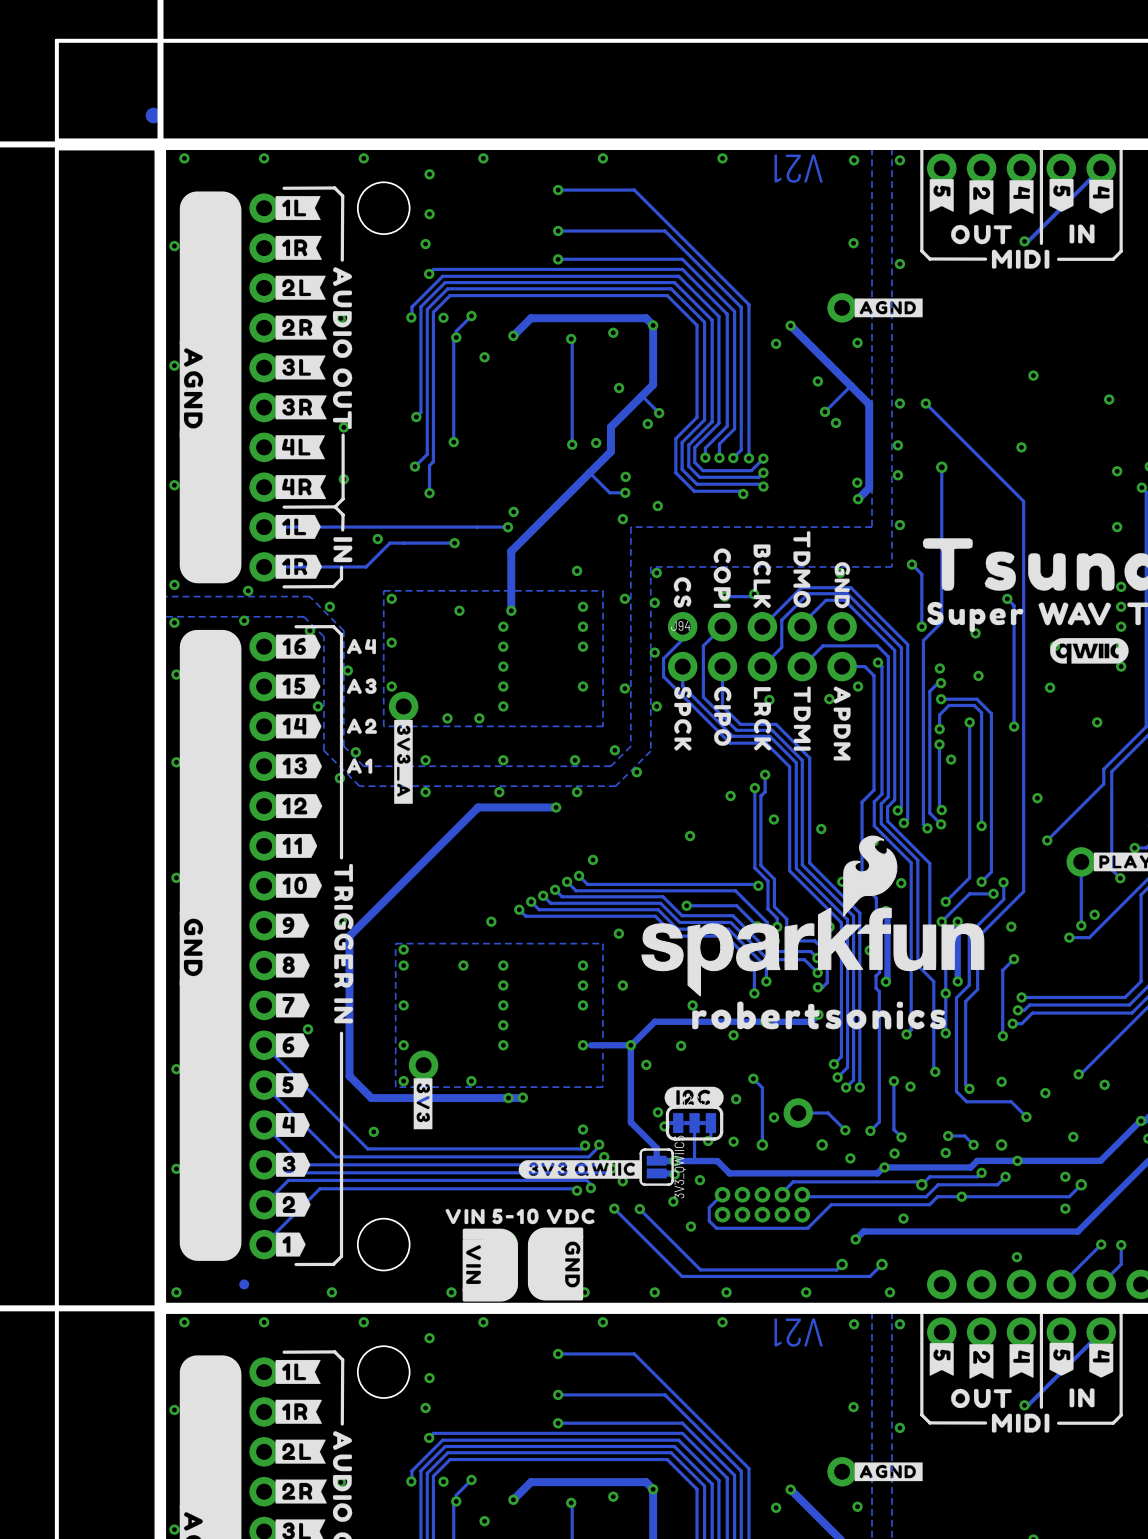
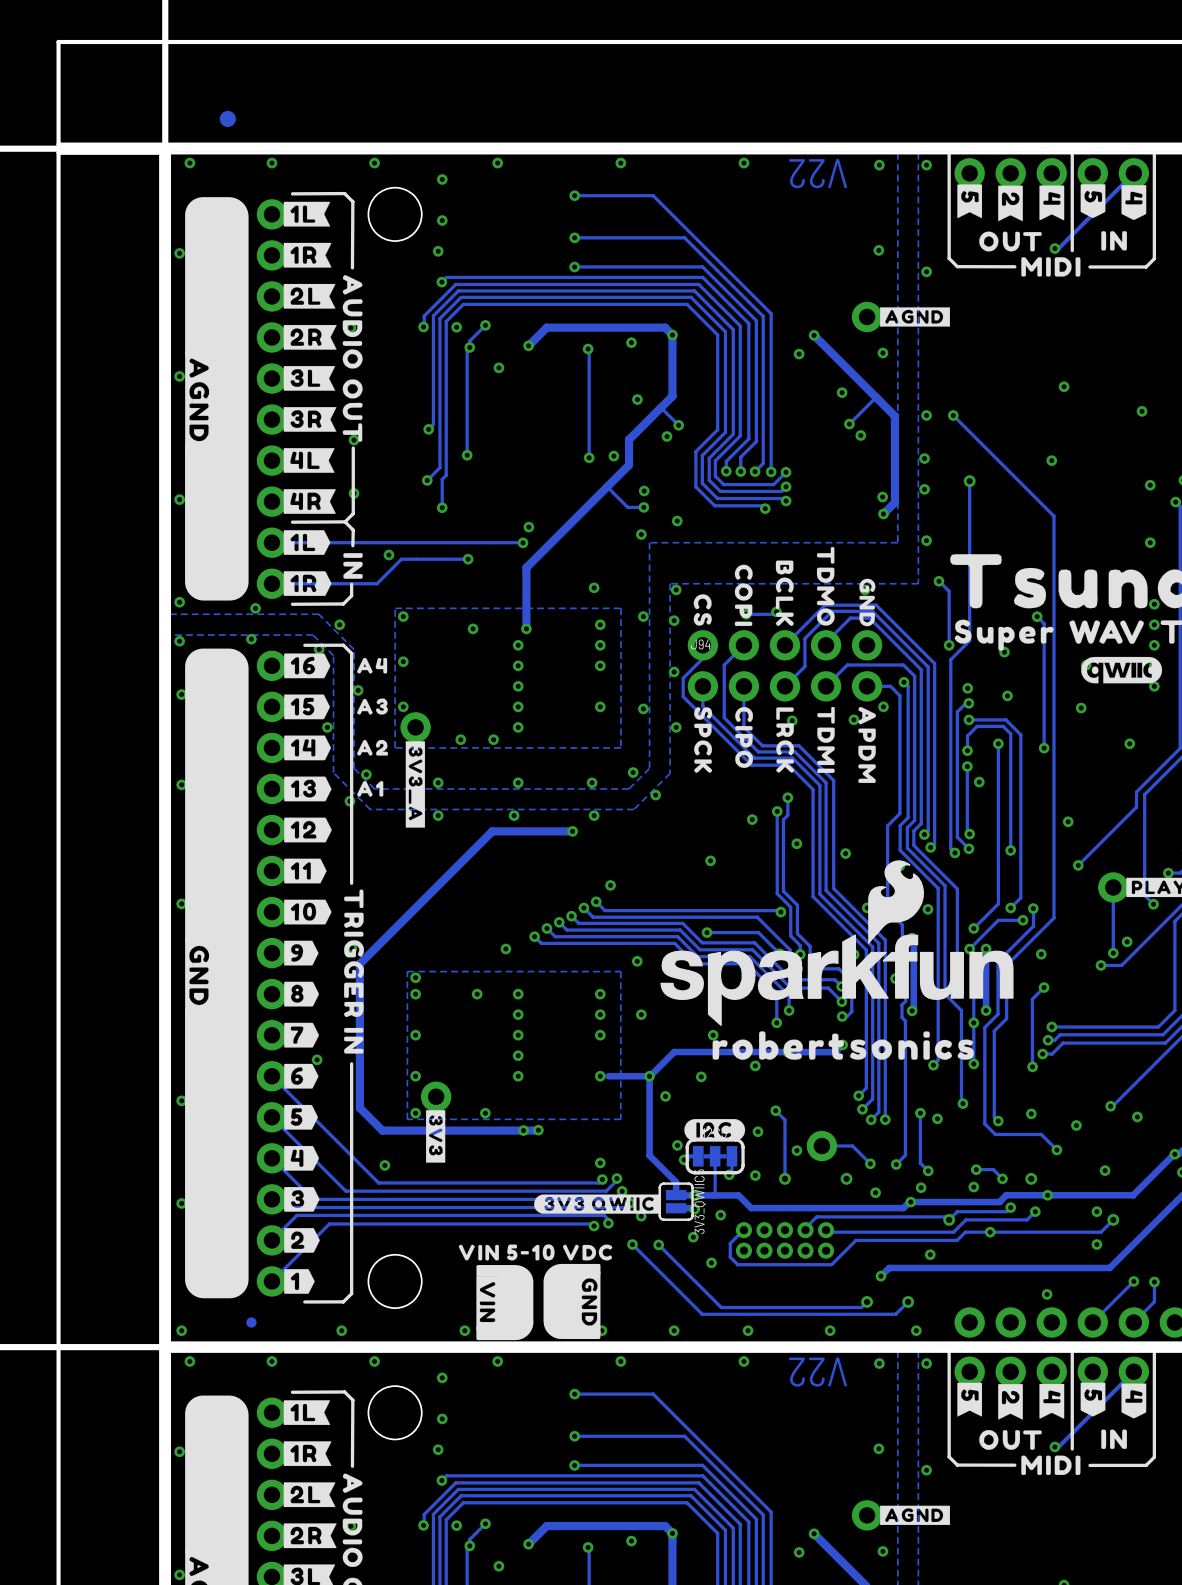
part position: (153, 115) -> (227, 118)
text: V21 (798, 168) -> V22 (818, 173)
text: V21 (798, 1332) -> V22 (818, 1372)

